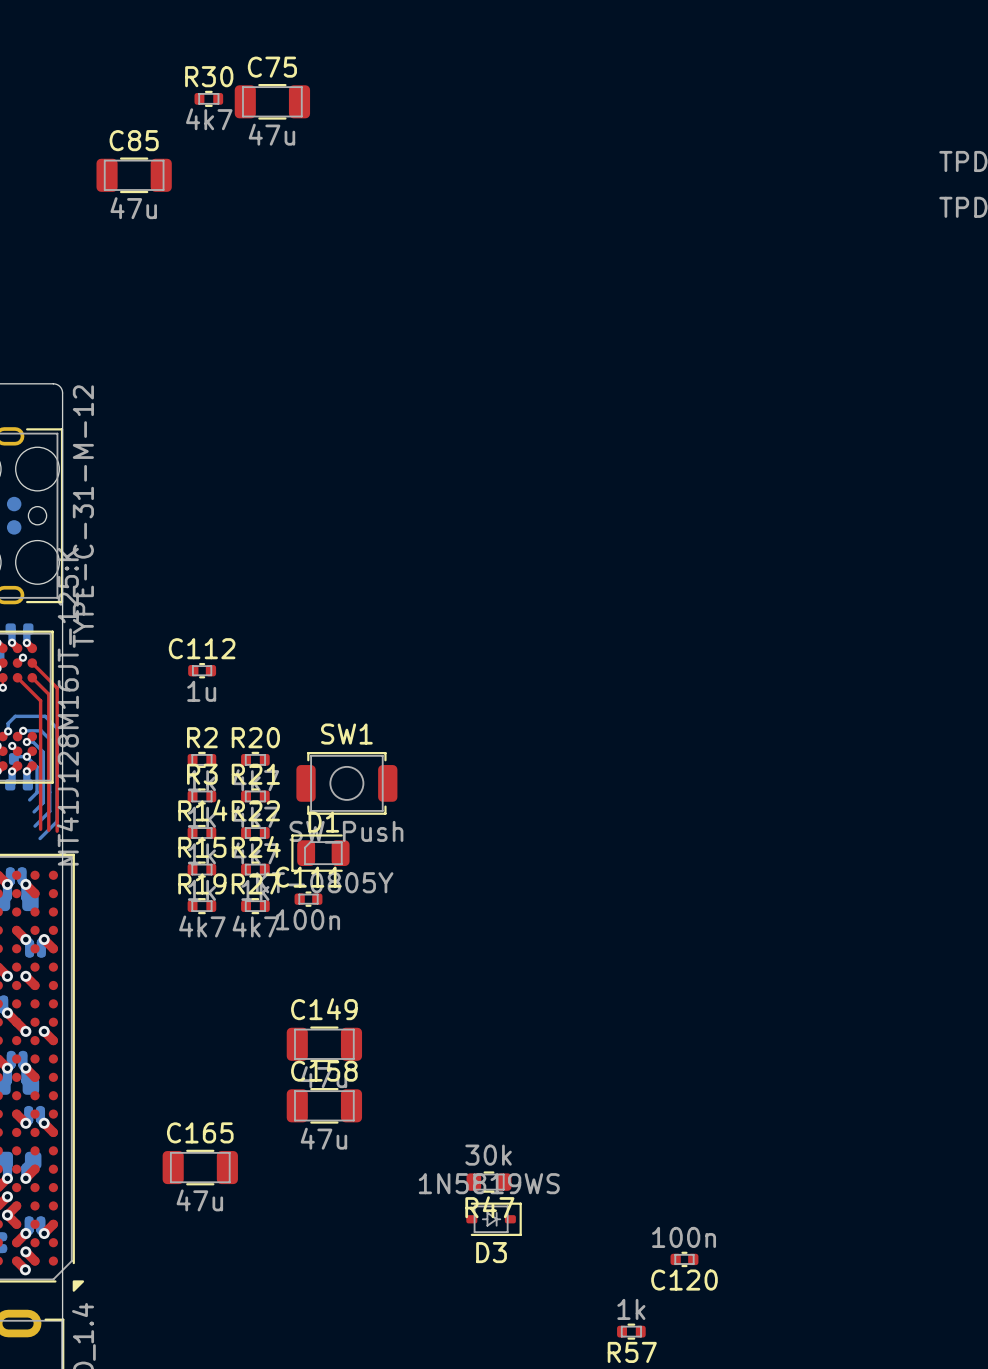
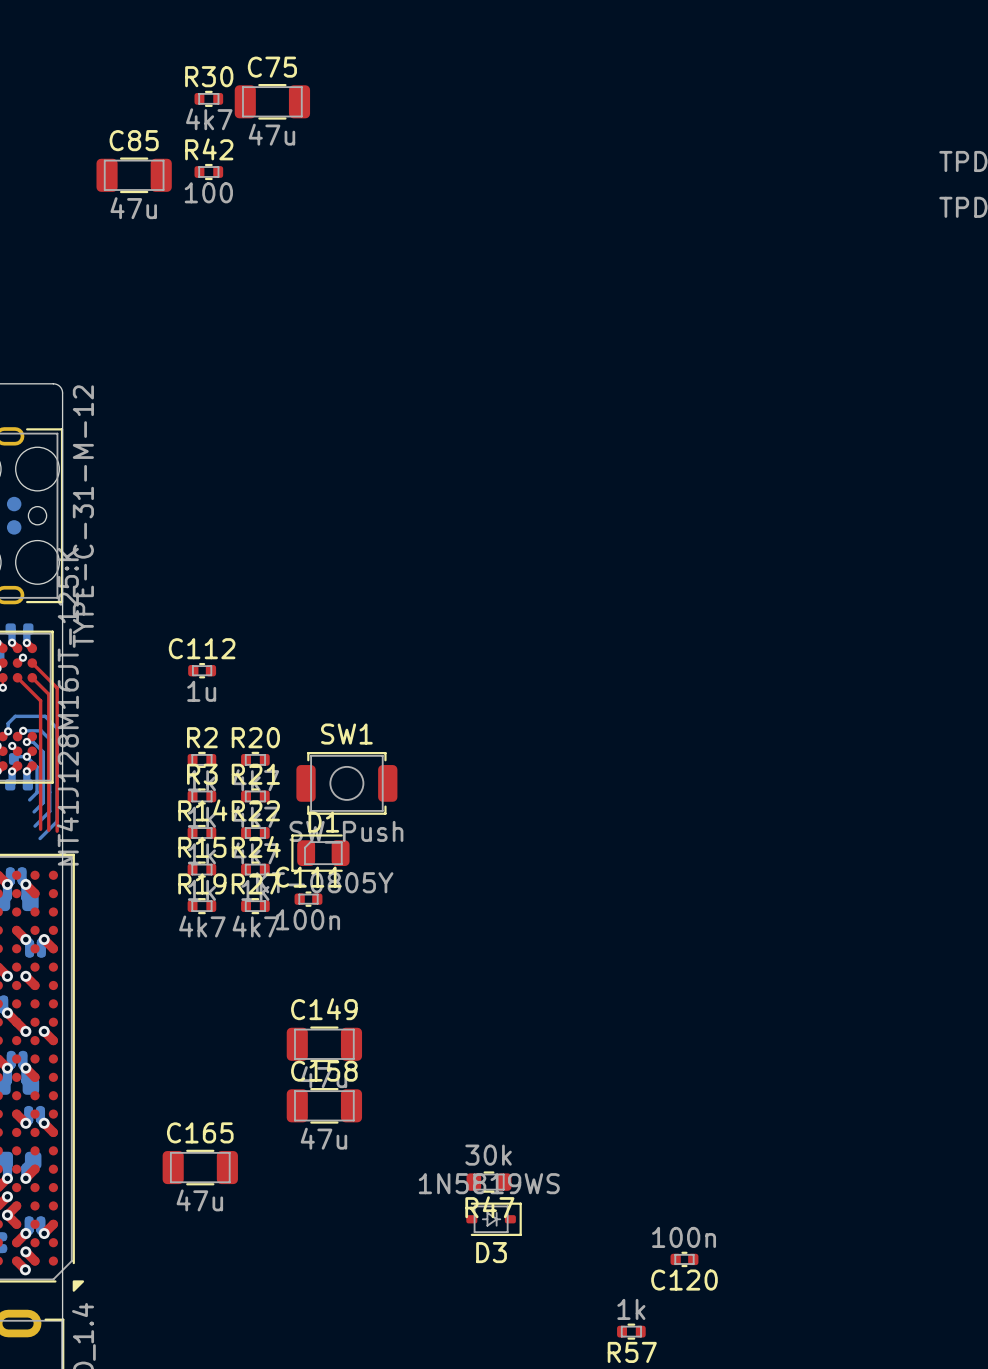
R42: none -> 100 (208, 171)

